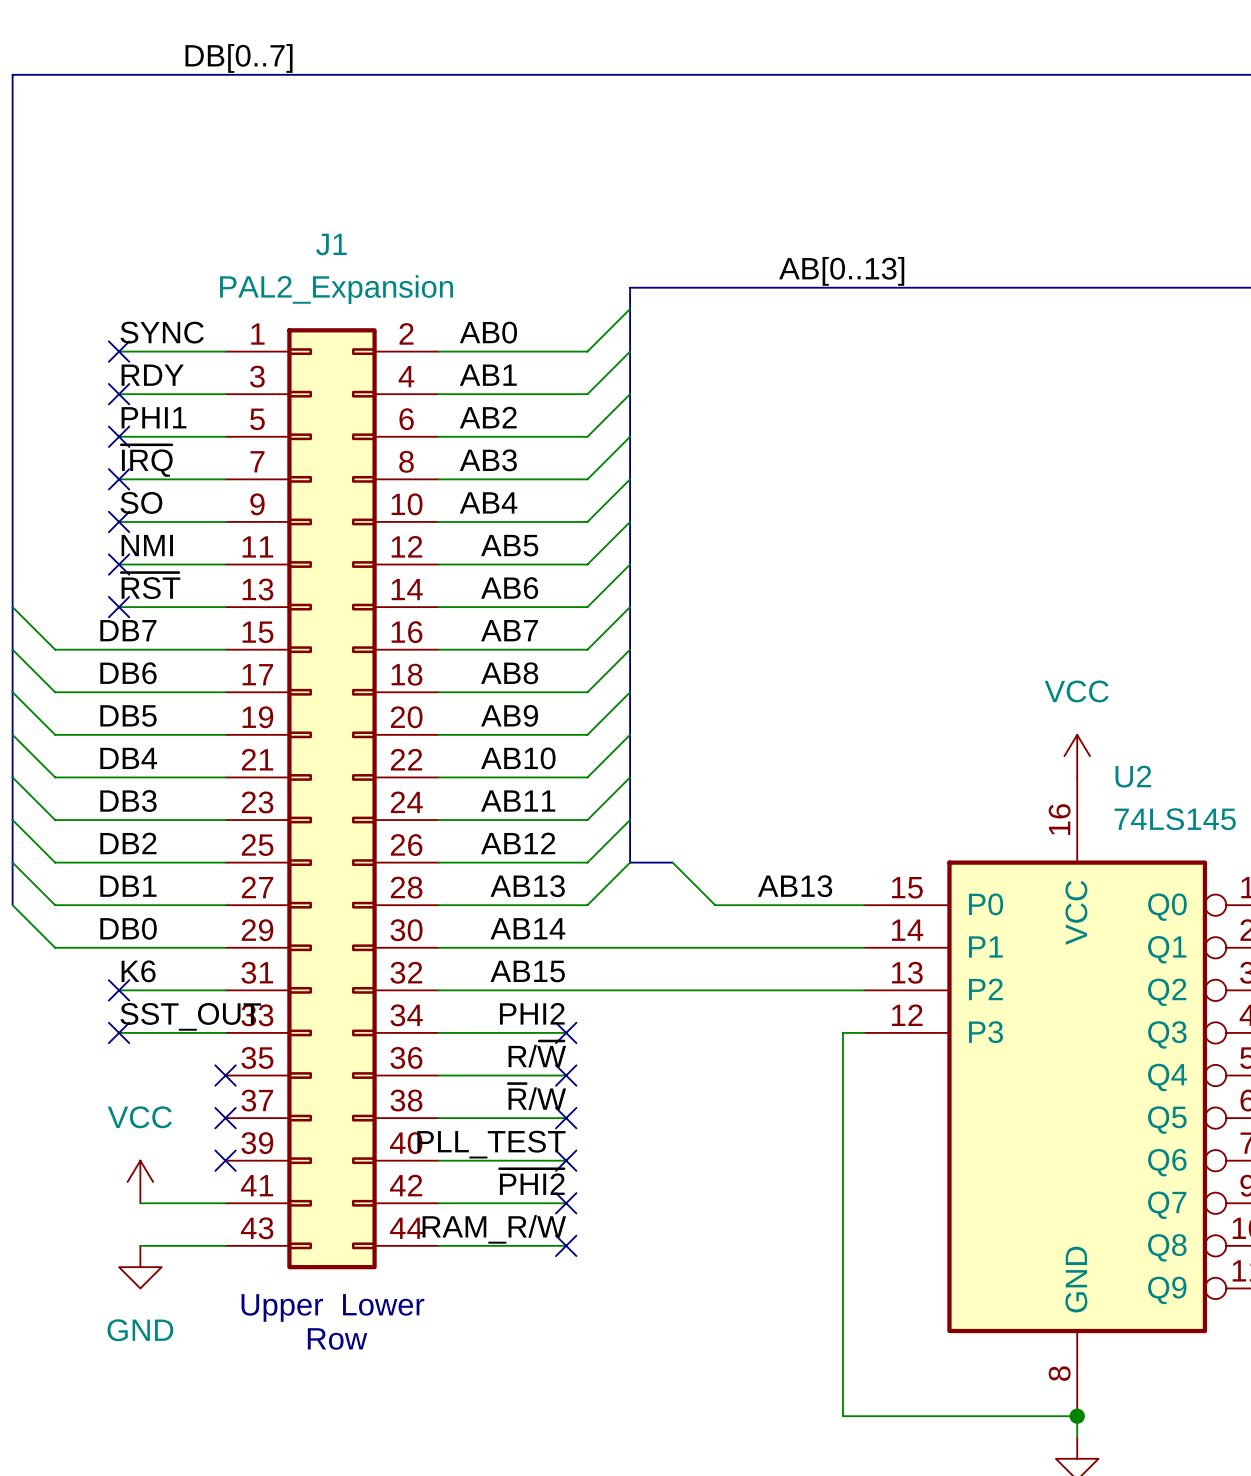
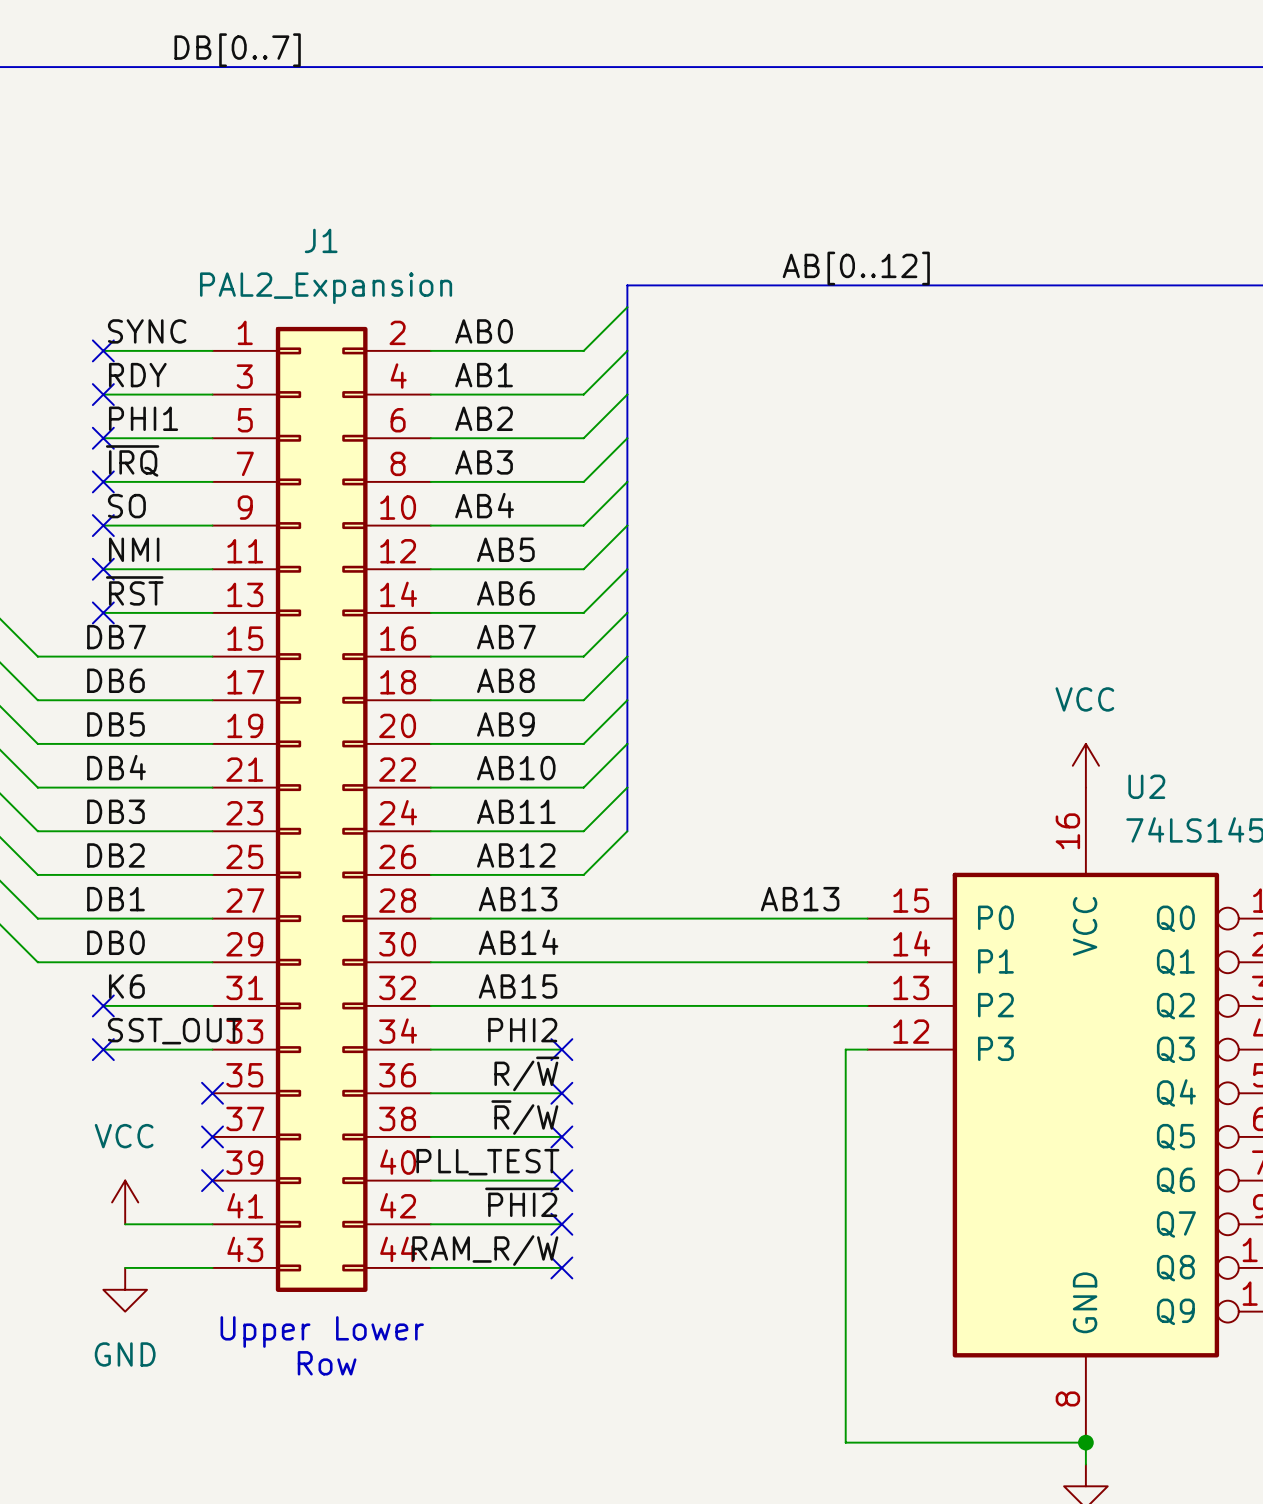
label: AB[0..13] (841, 271) -> AB[0..12] (856, 268)
bus: (630, 820) (630, 862) (672, 862) -> none
wire: (630, 862) (587, 905) -> (714, 918) (583, 918)
wire: (672, 862) (715, 905) -> none

